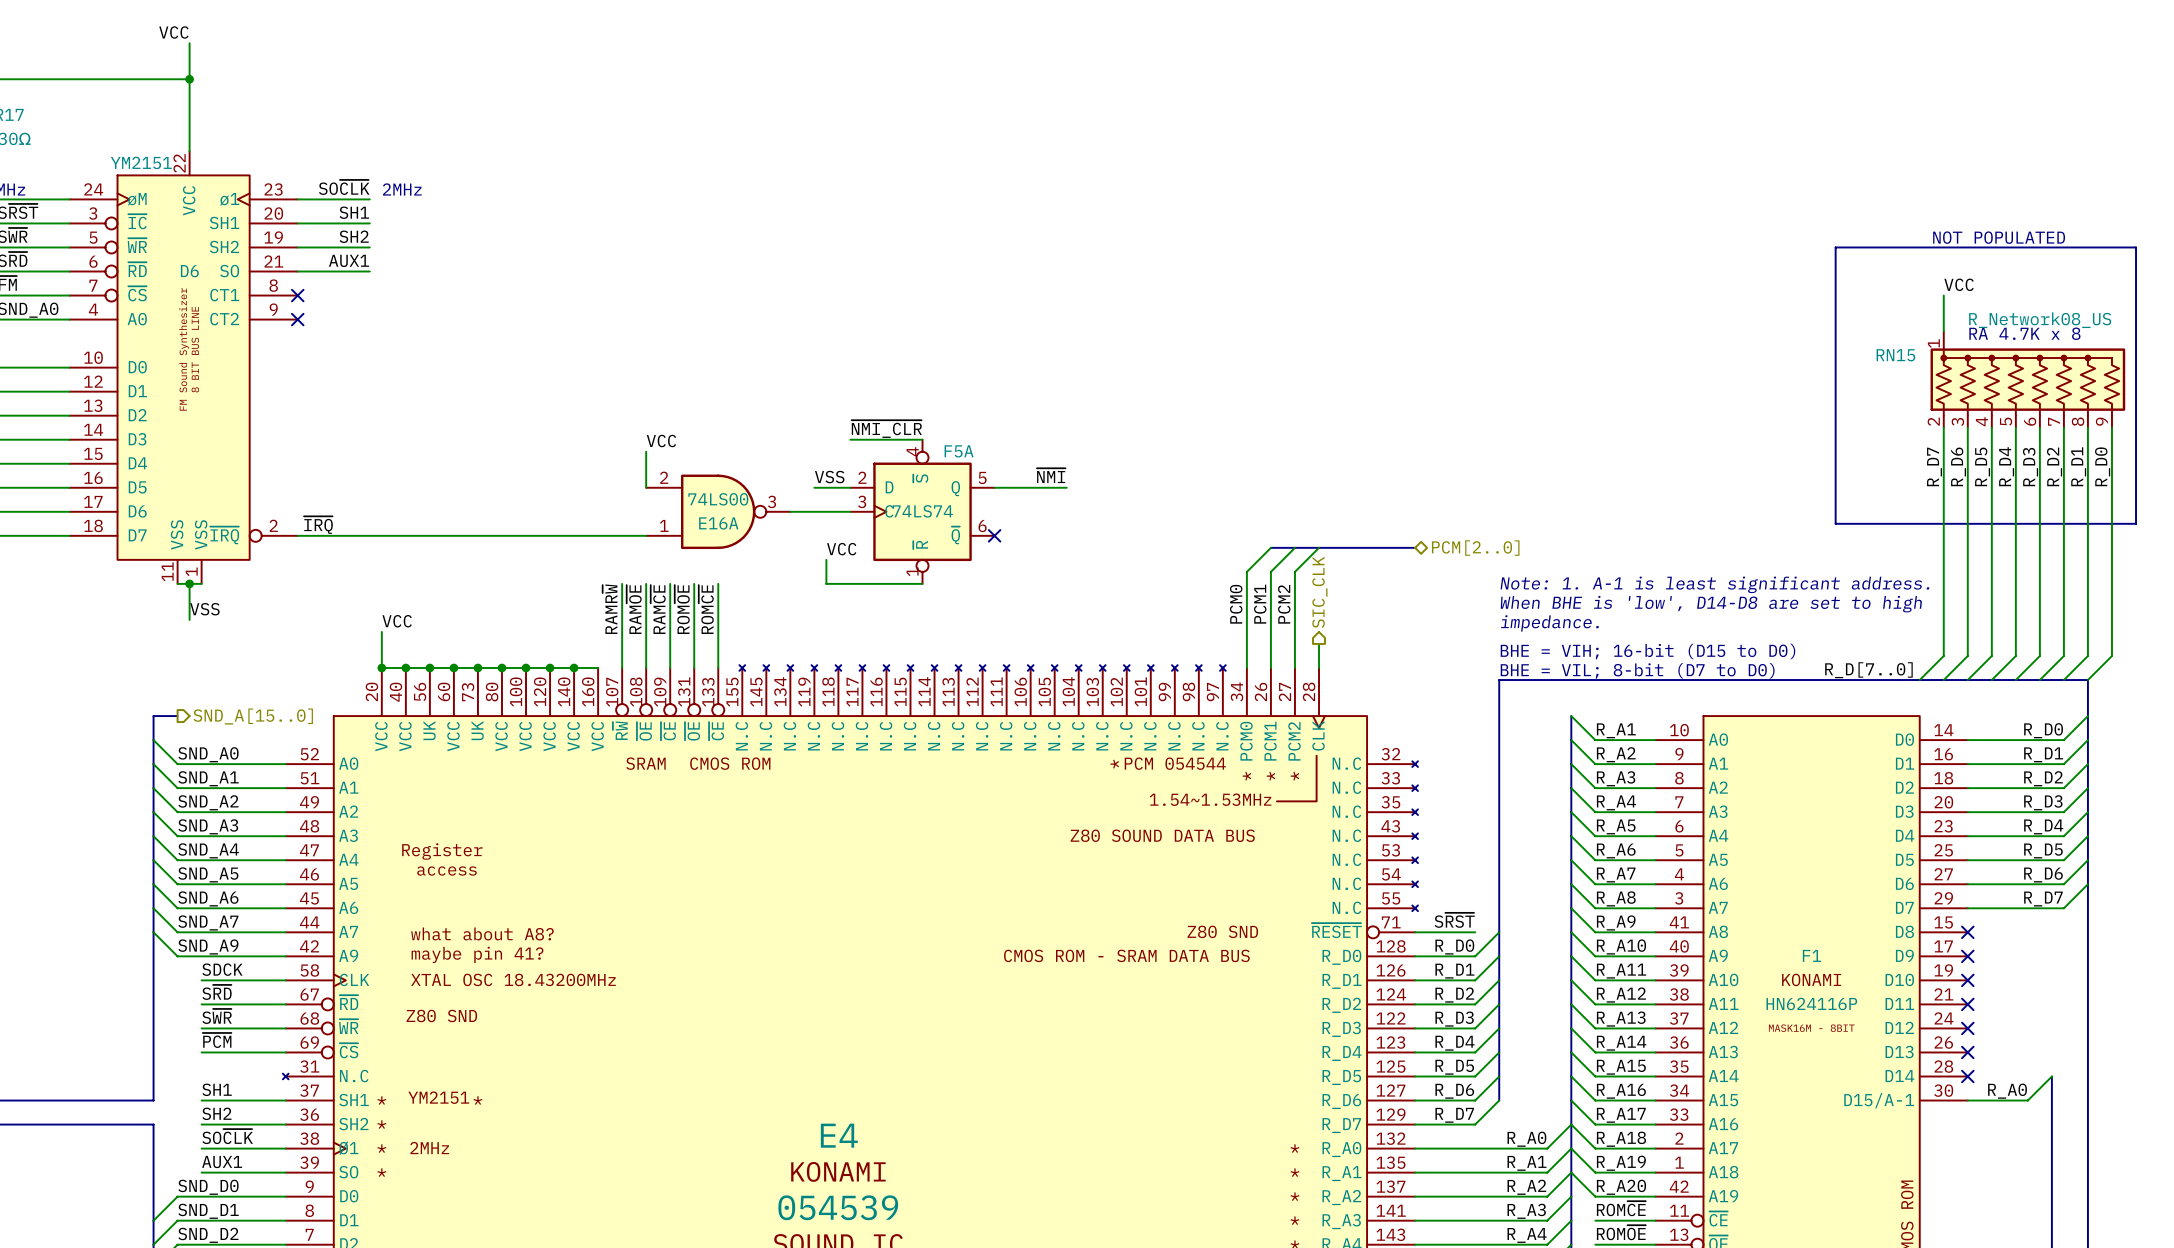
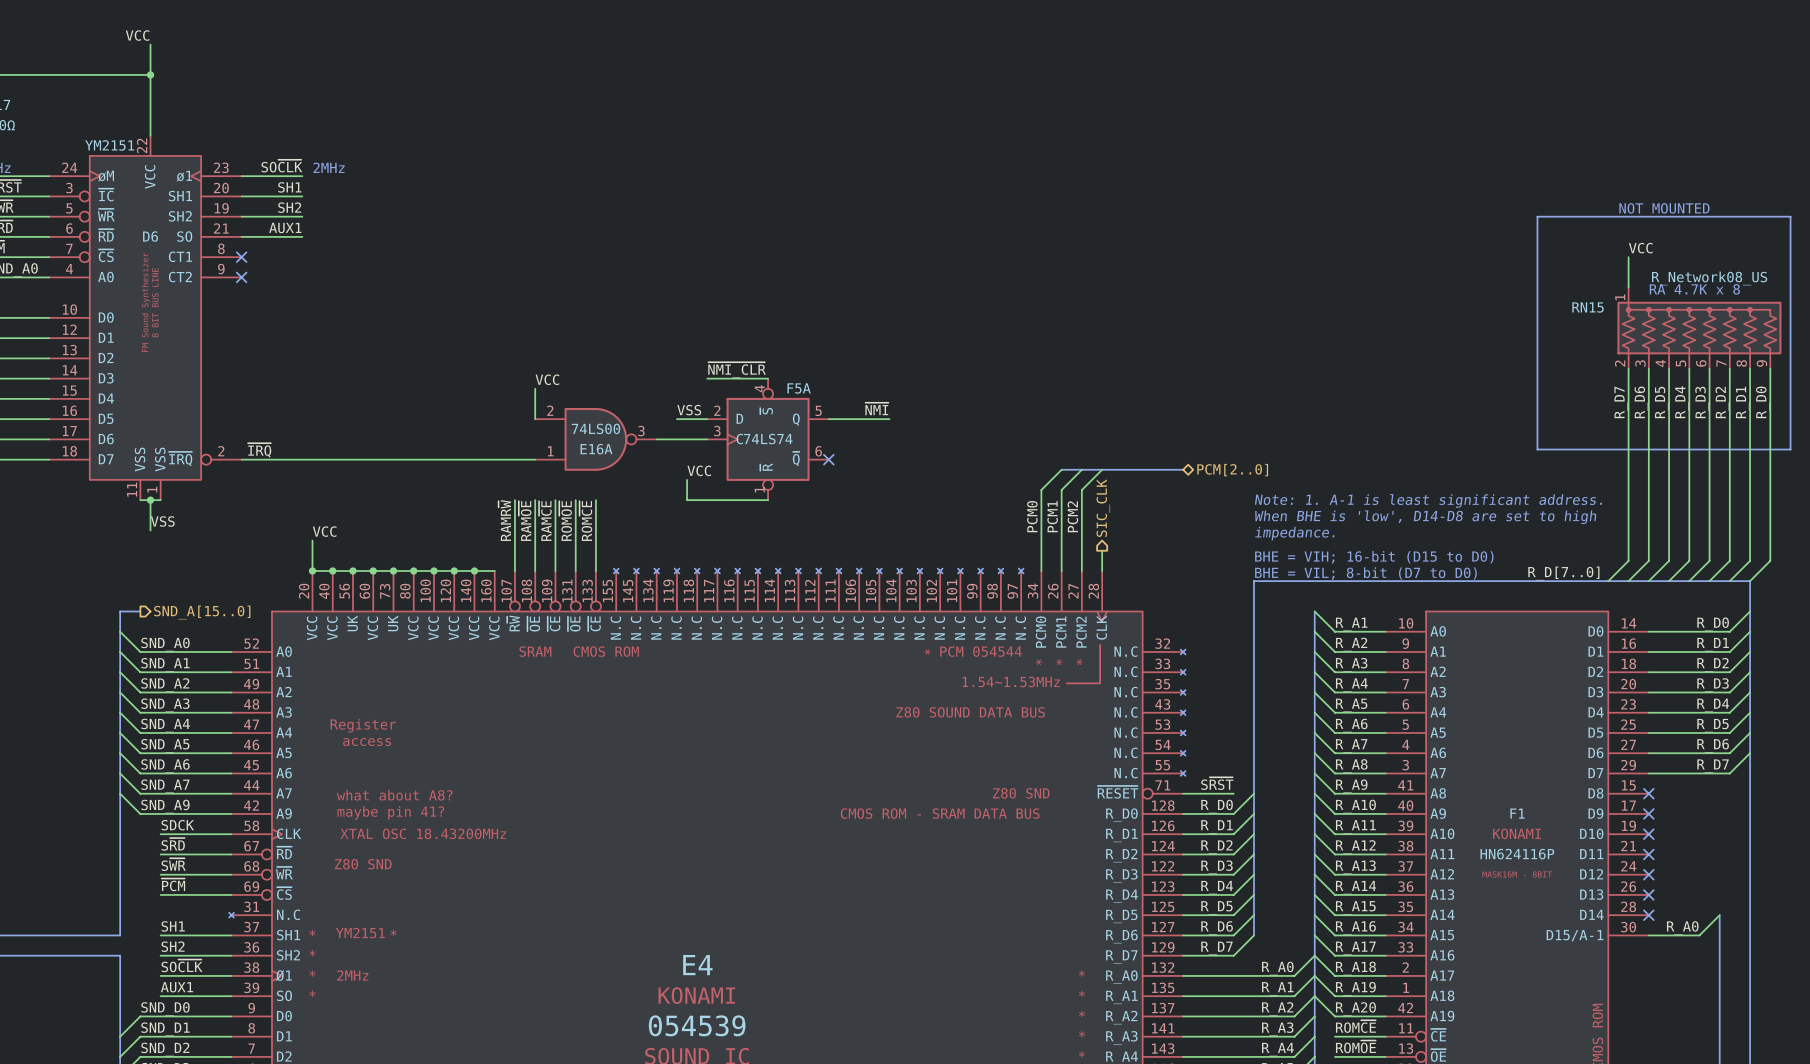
text: NOT POPULATED (1999, 237) -> NOT MOUNTED (1664, 208)

